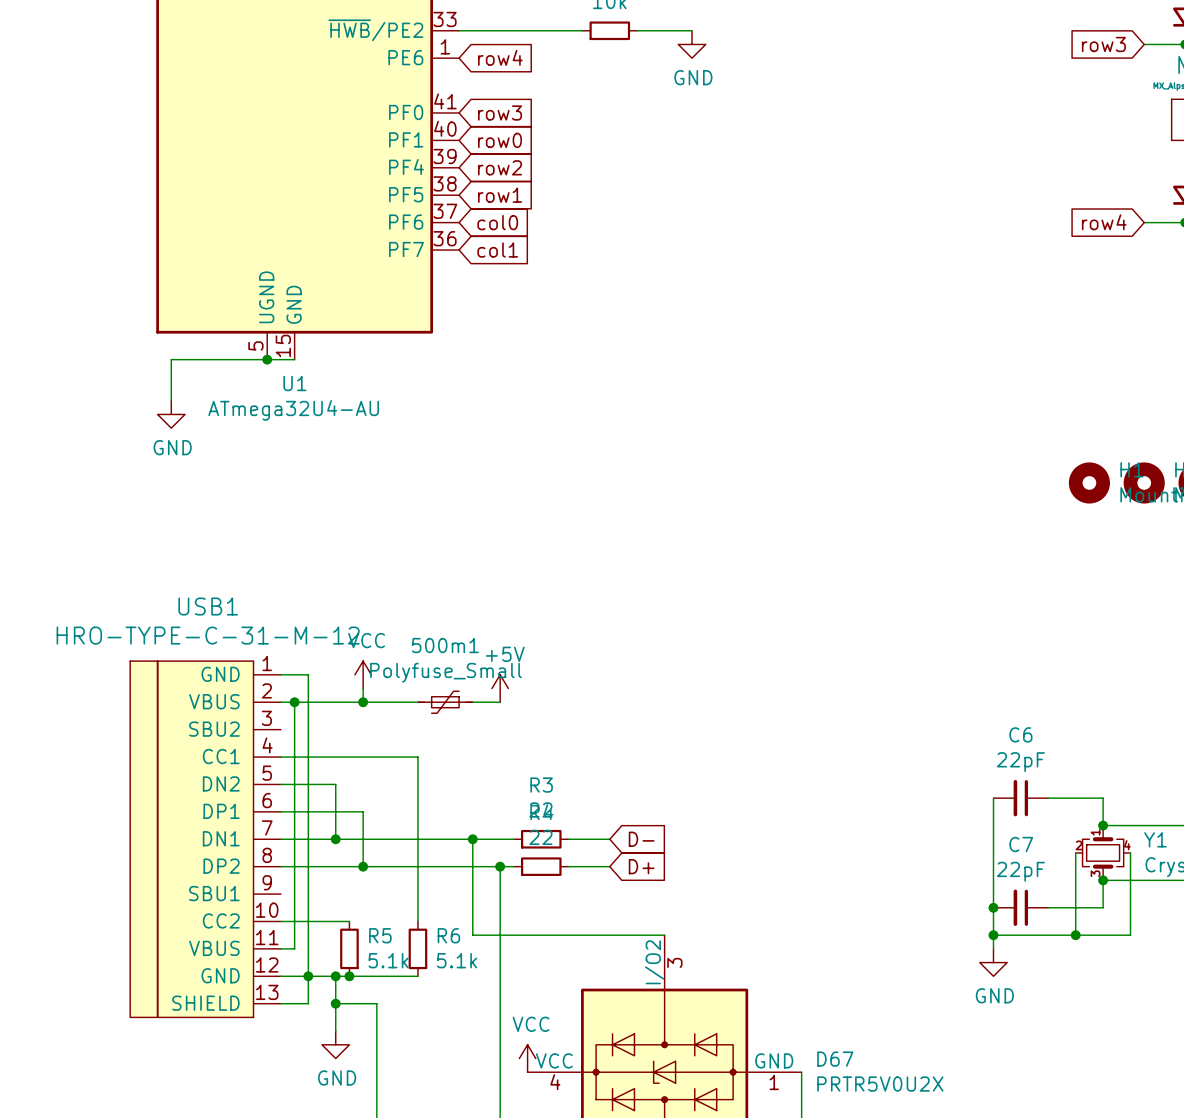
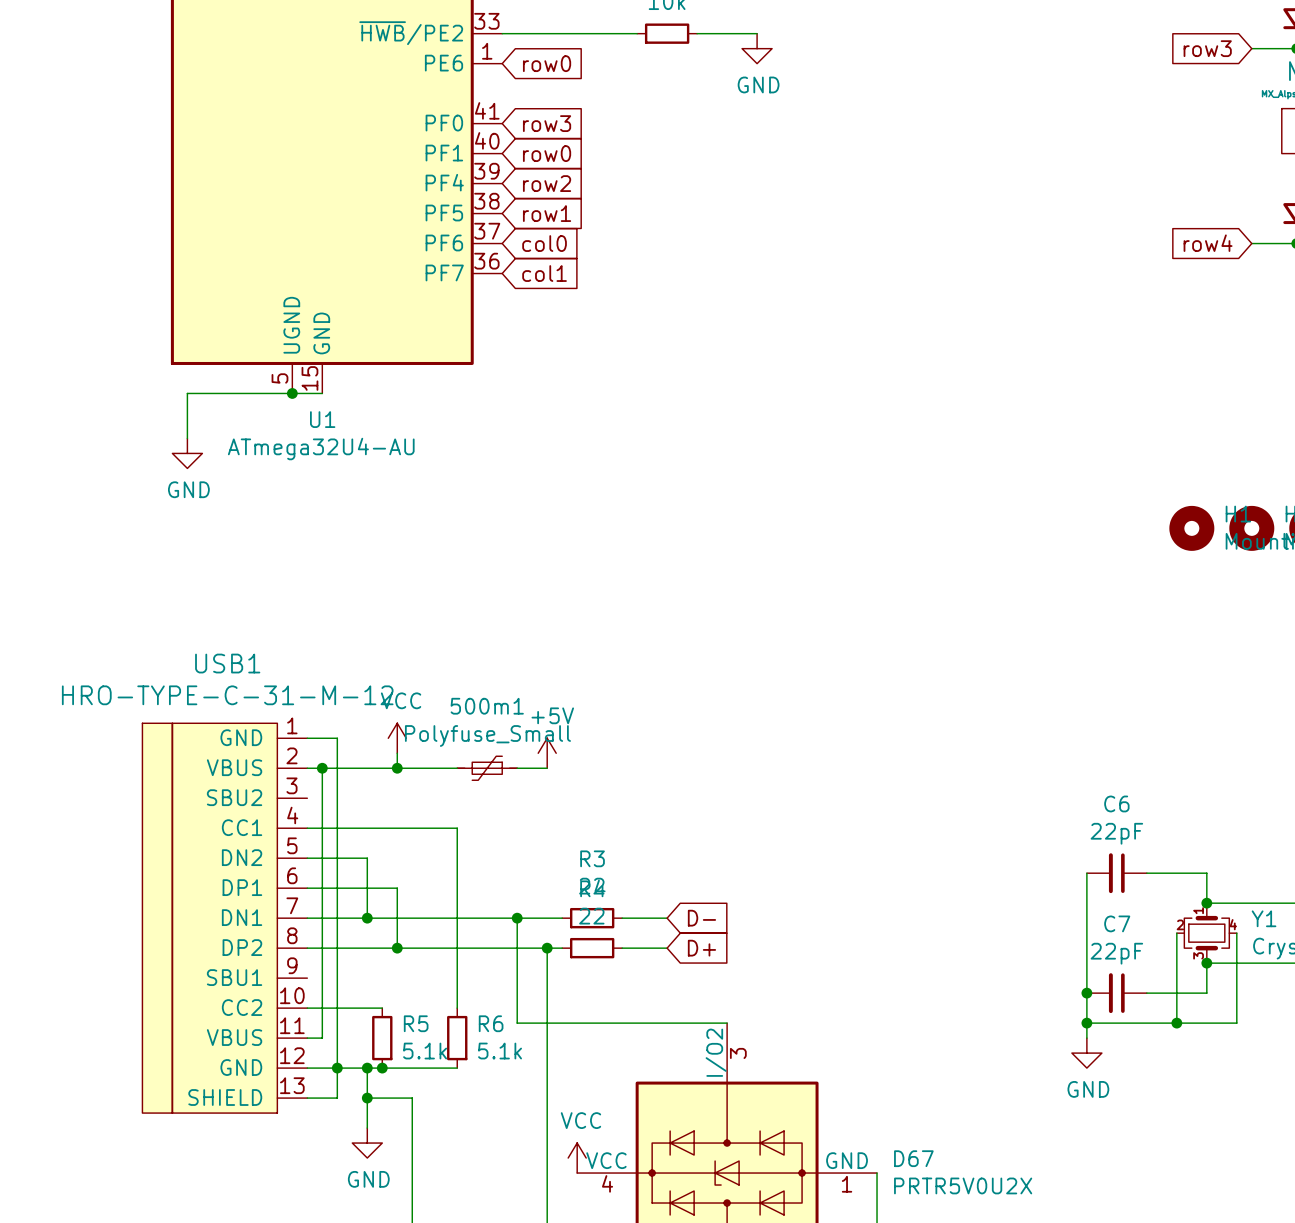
global label: row4 (500, 57) -> row0 (547, 63)

